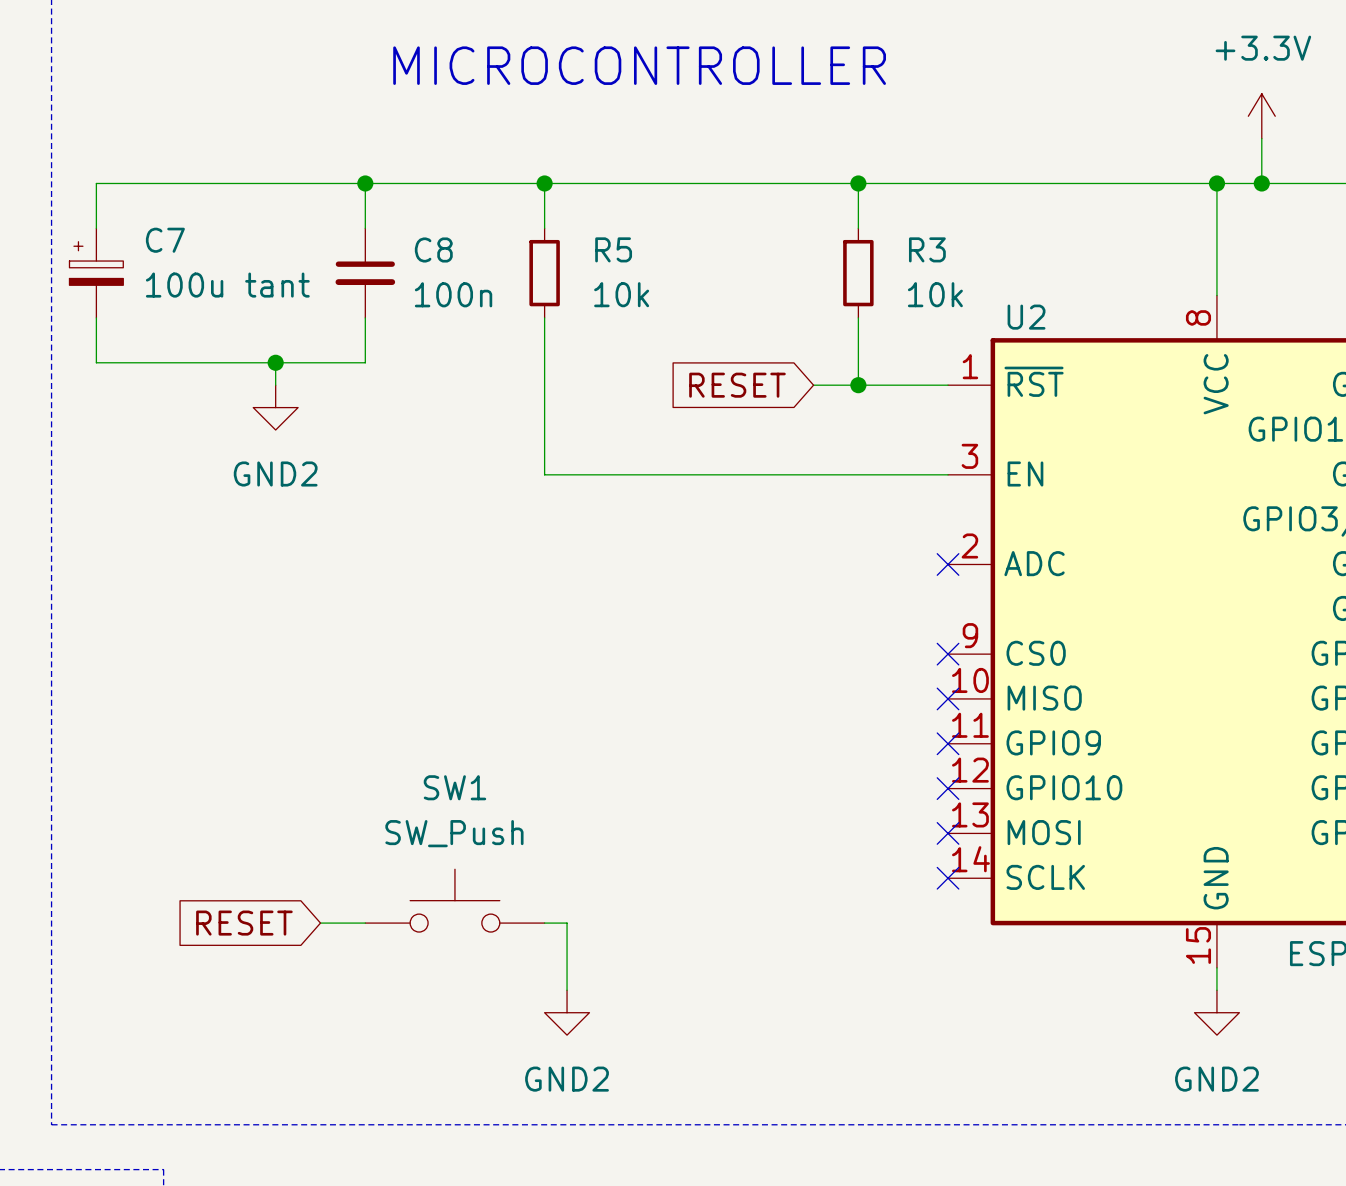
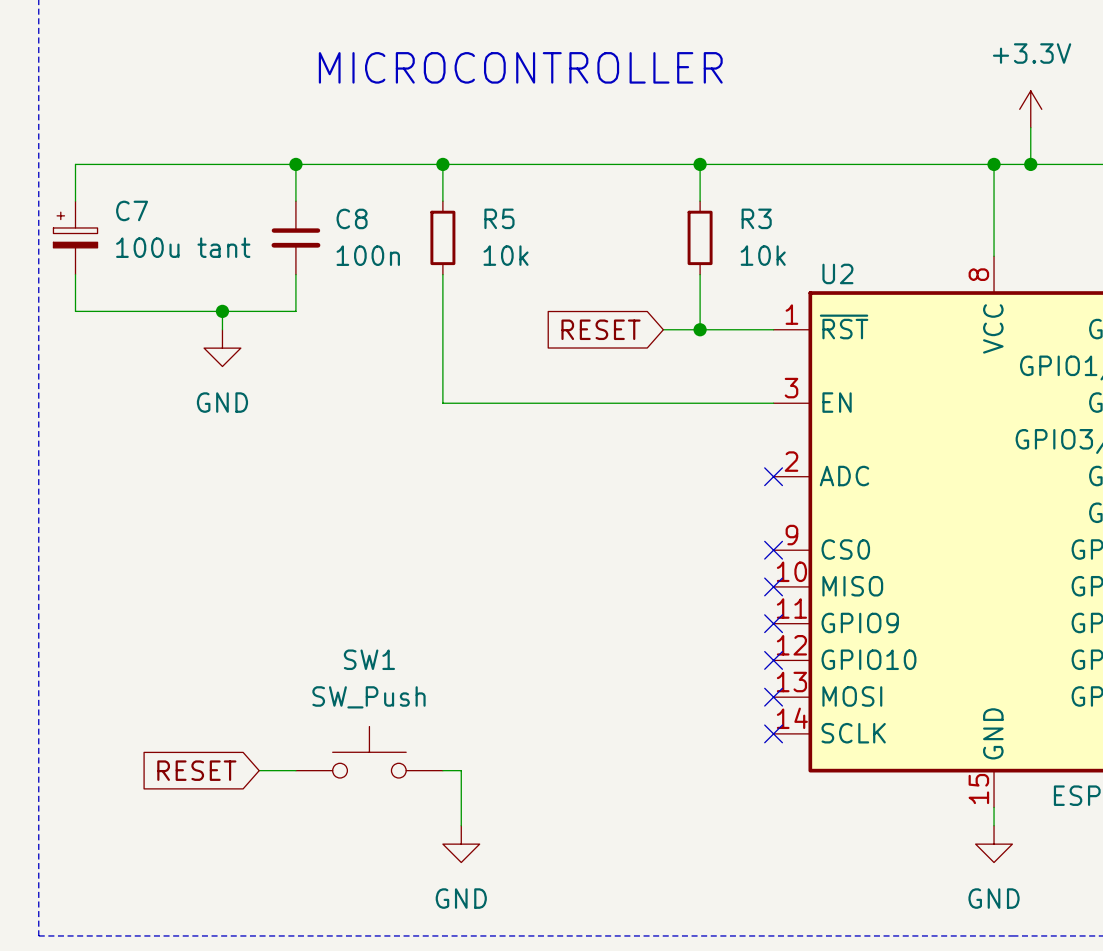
power symbol: GND2 (275, 407) -> GND (222, 348)
power symbol: GND2 (567, 1012) -> GND (461, 844)
power symbol: GND2 (1216, 1012) -> GND (994, 844)

